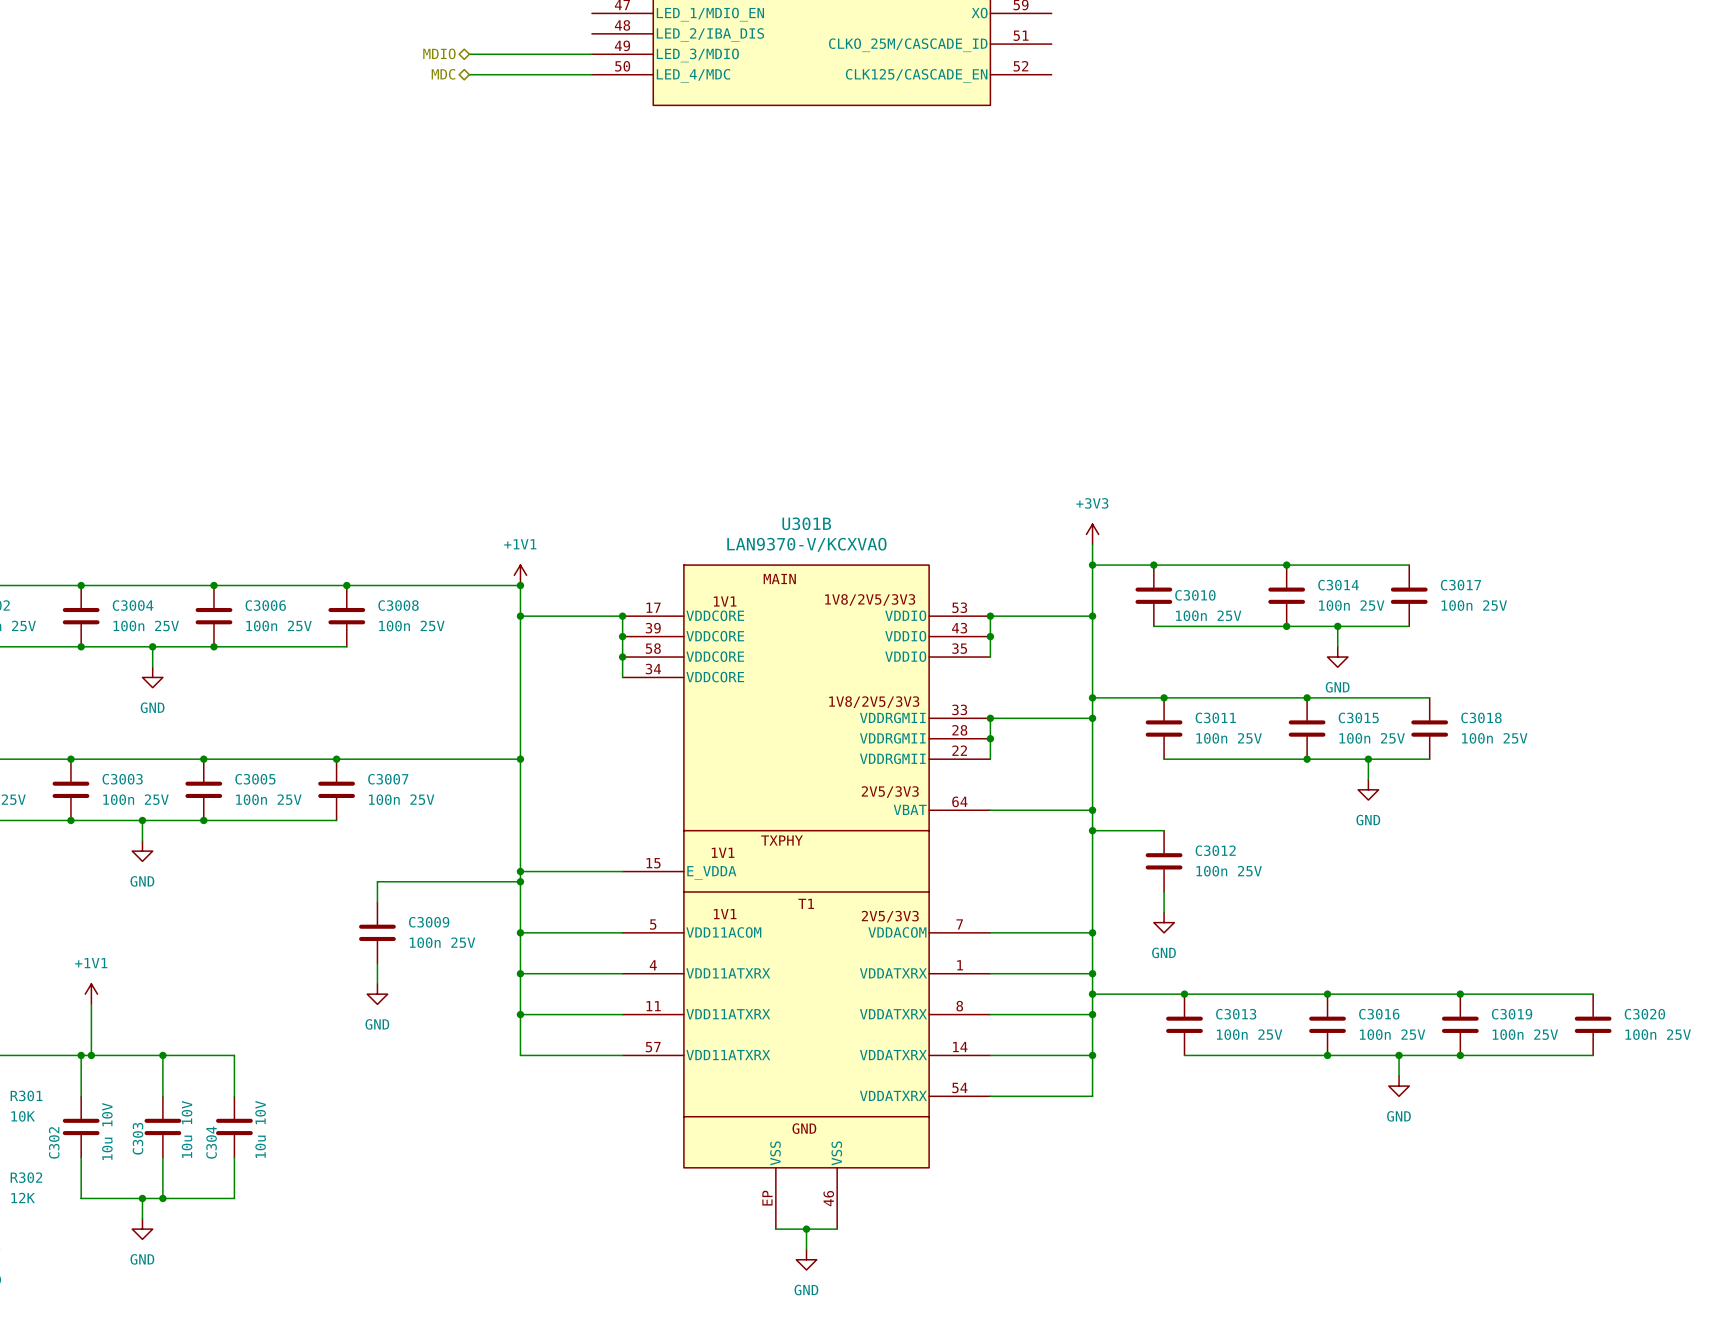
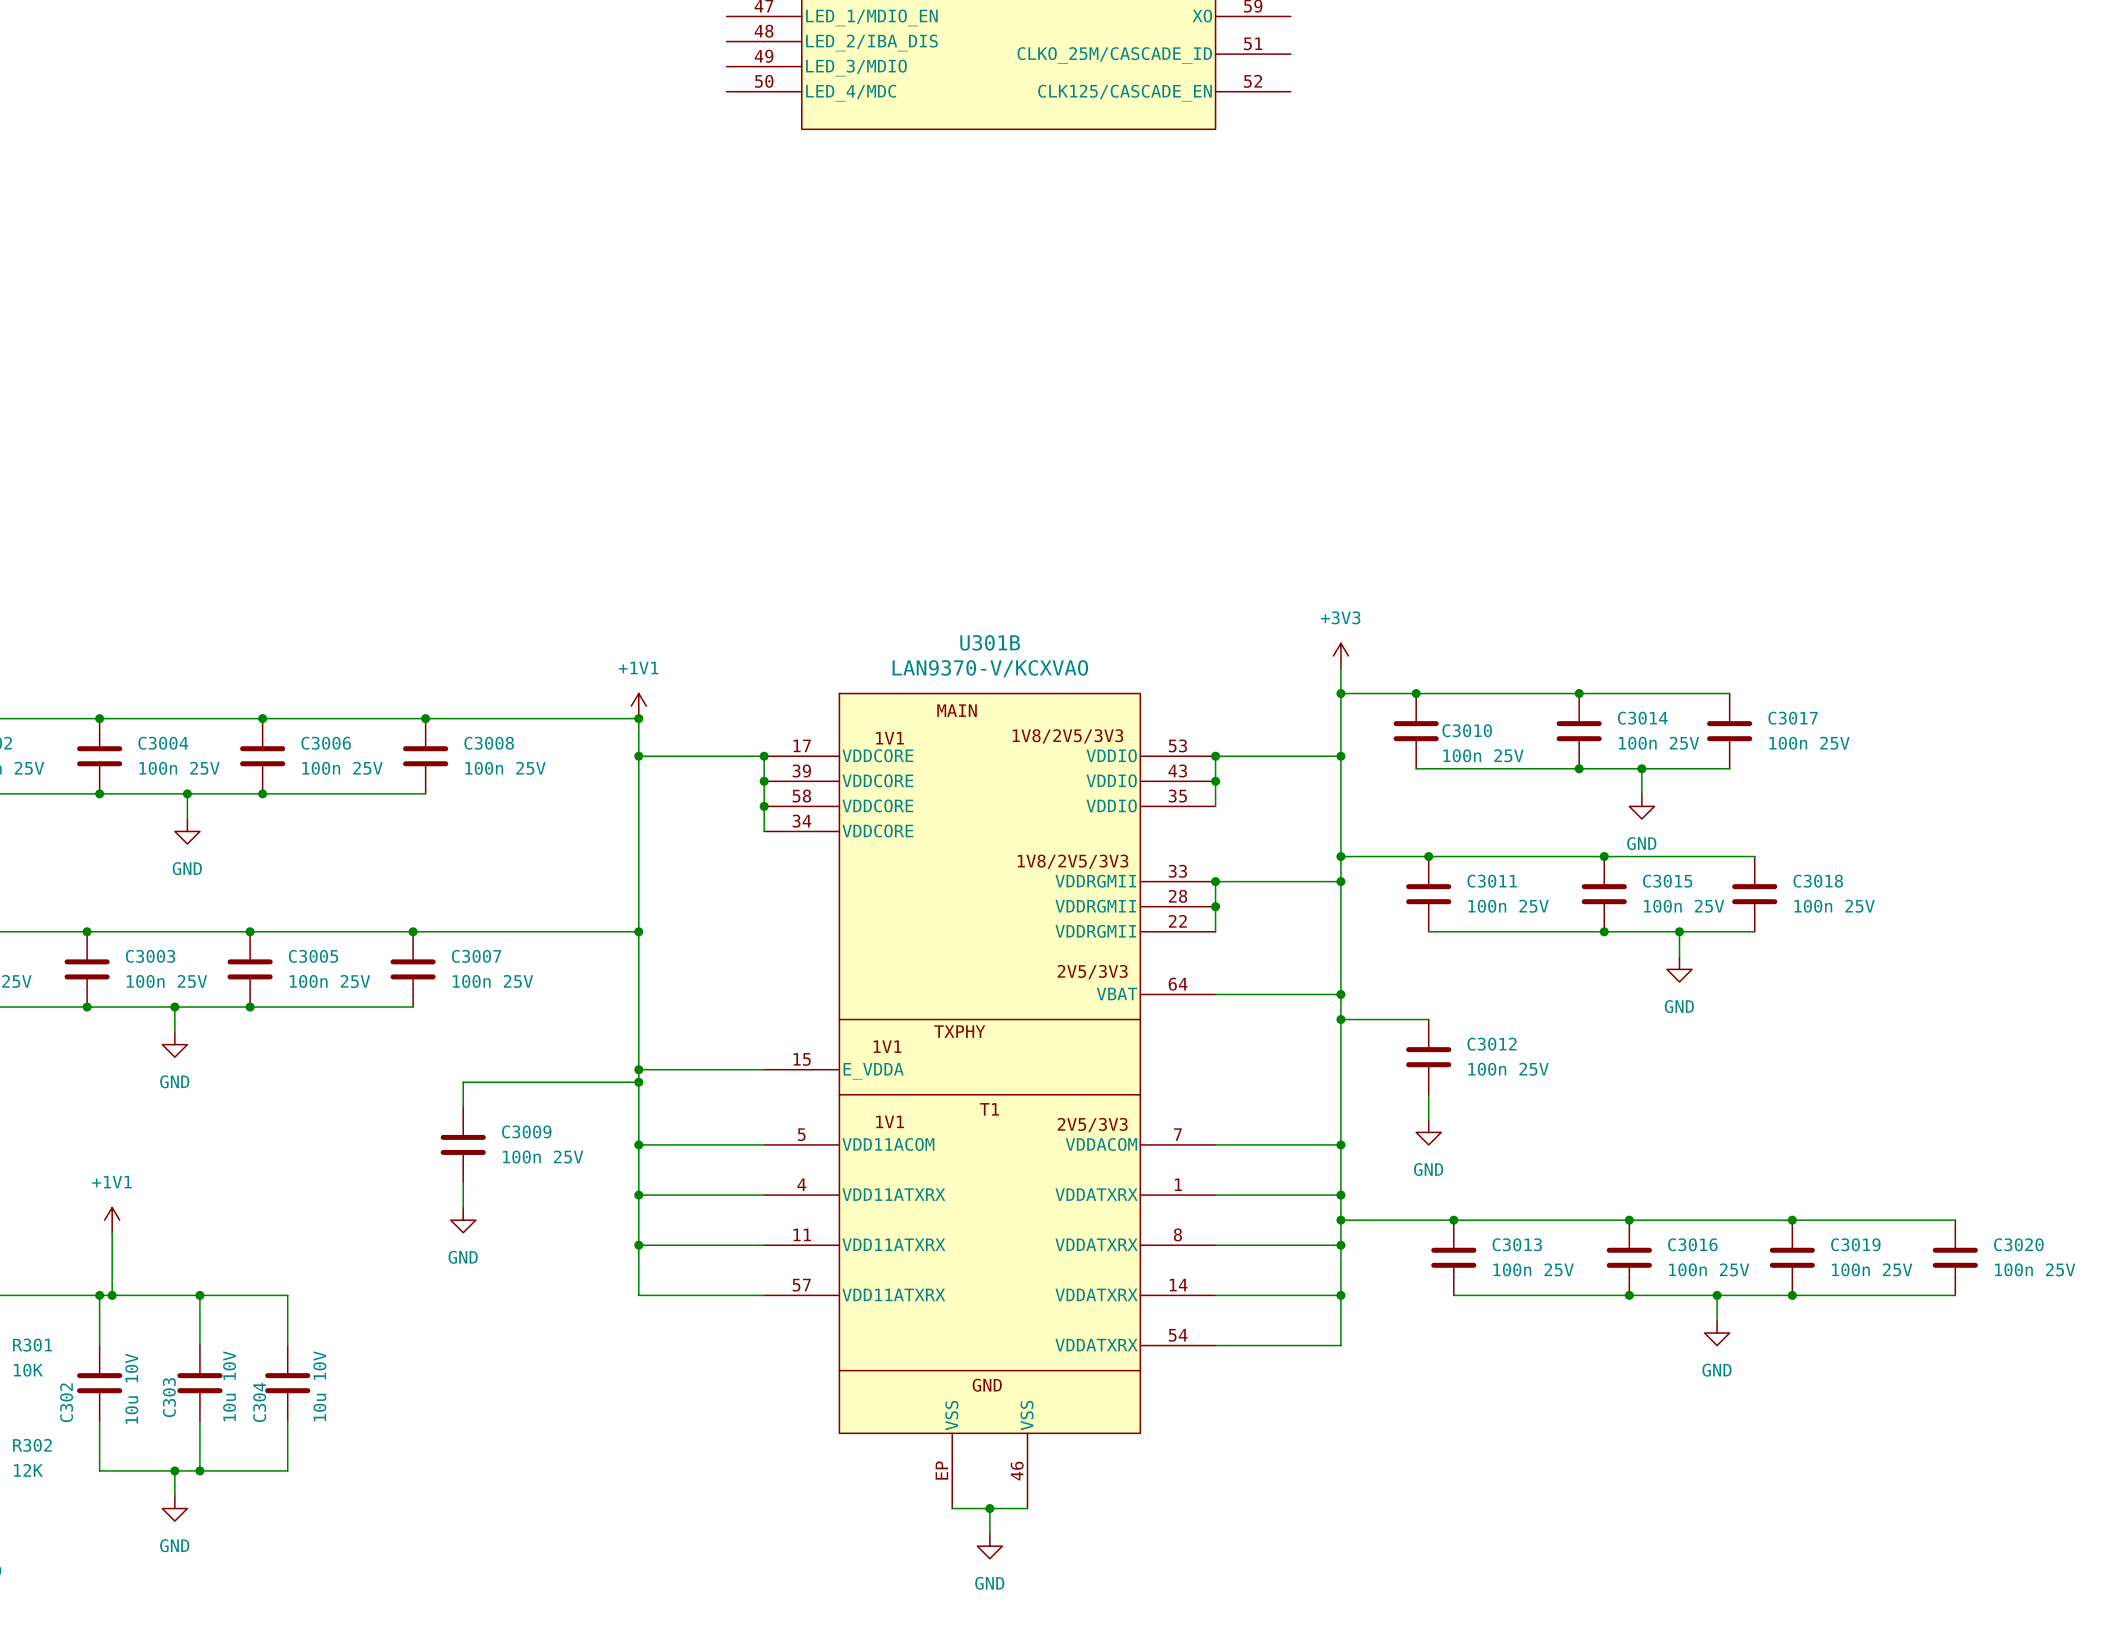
hierarchical label: MDIO (439, 53) -> none
wire: (469, 54) (591, 54) -> none
hierarchical label: MDC (443, 74) -> none
wire: (469, 74) (591, 74) -> none

